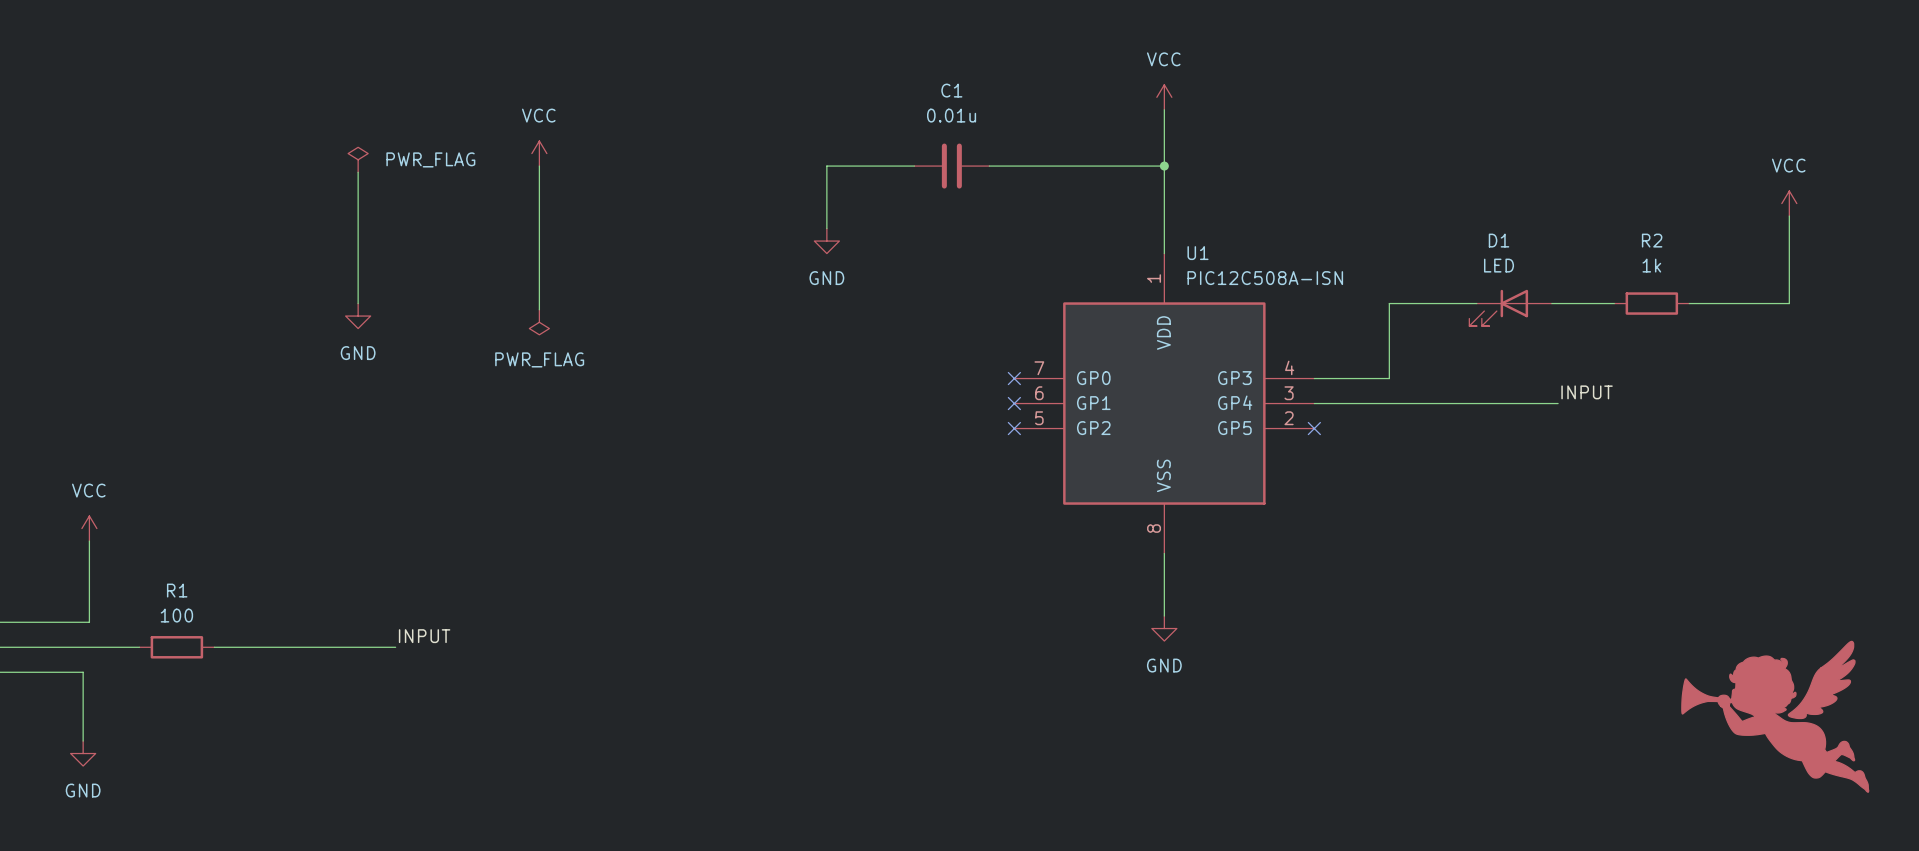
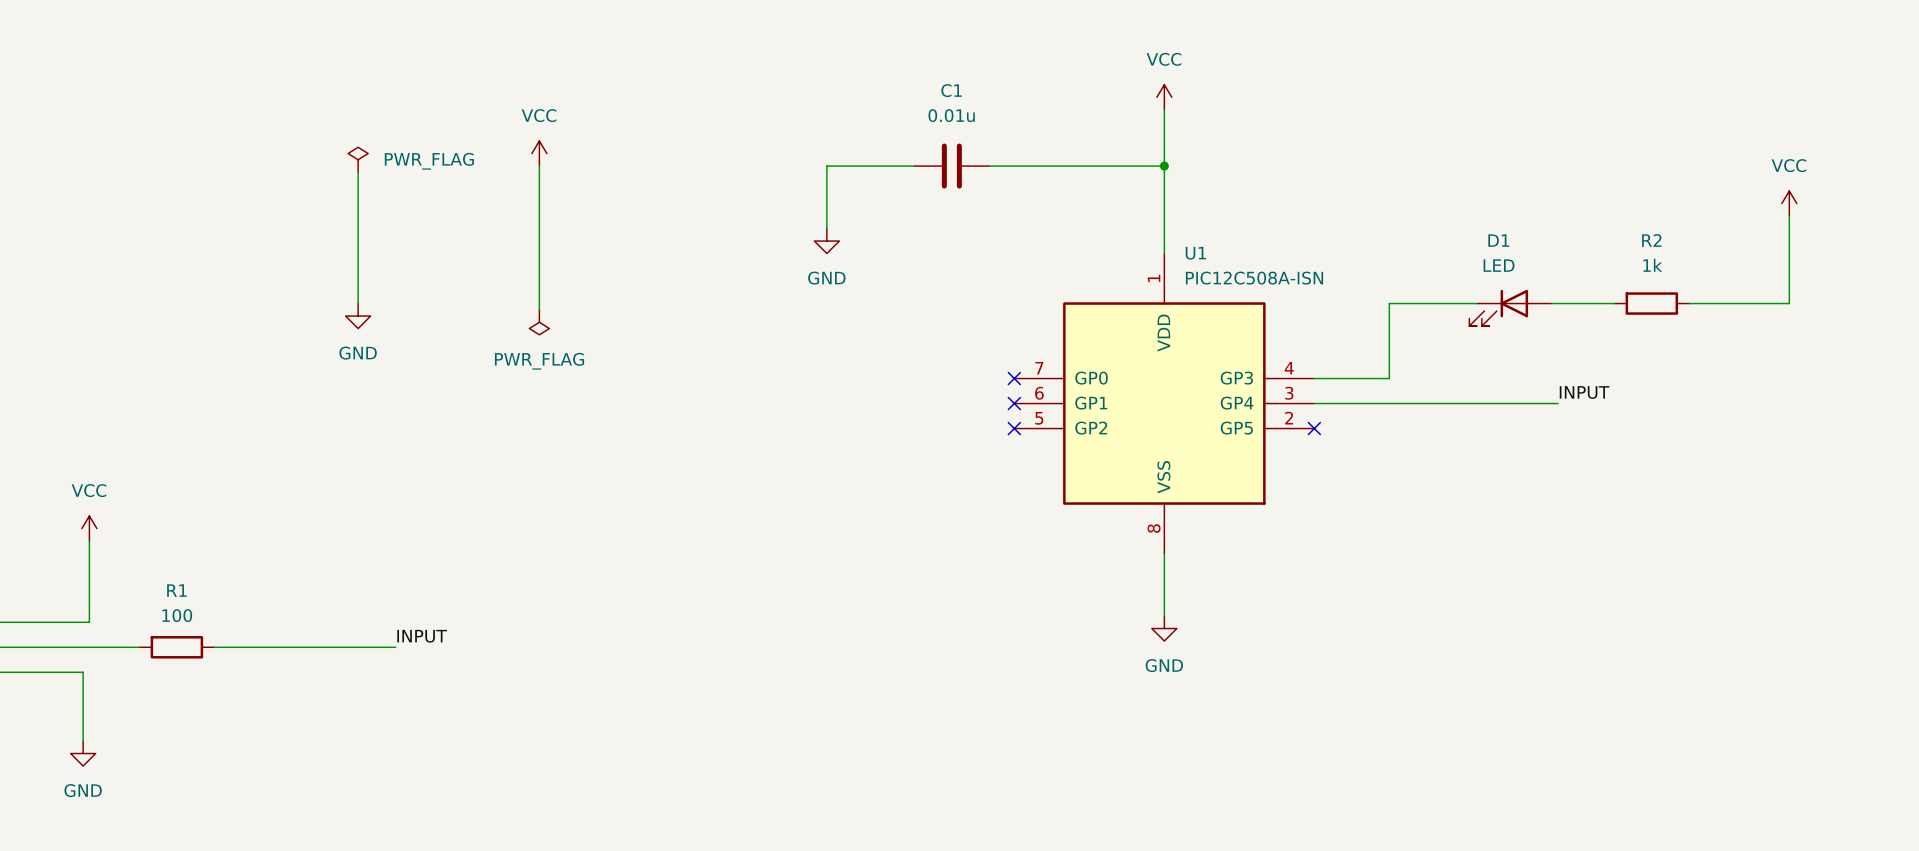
power symbol: (1775, 716) -> none

